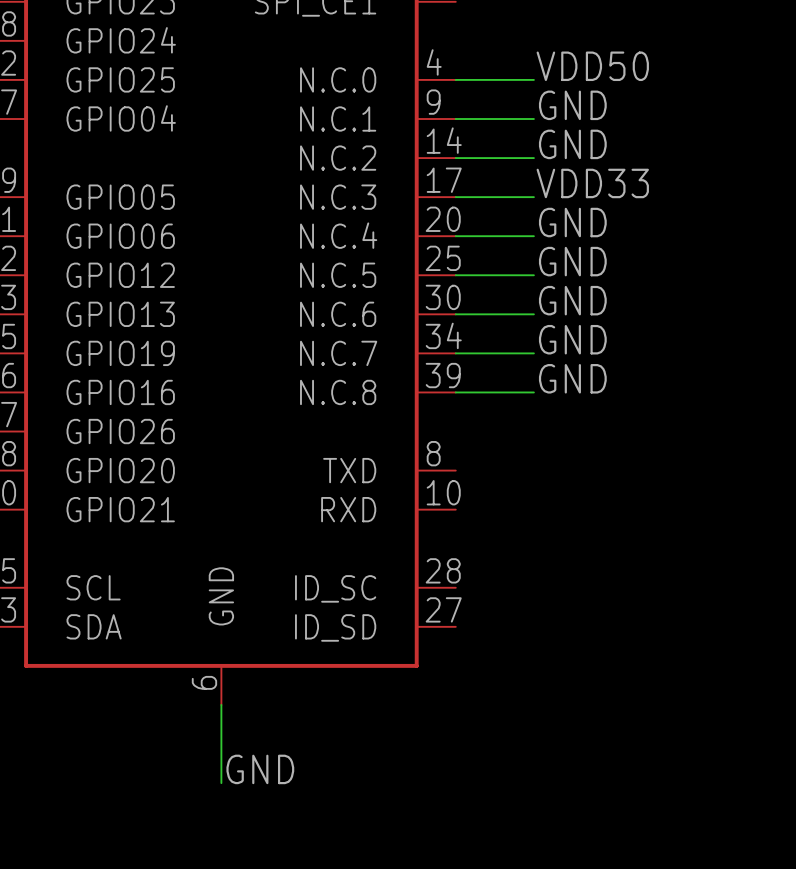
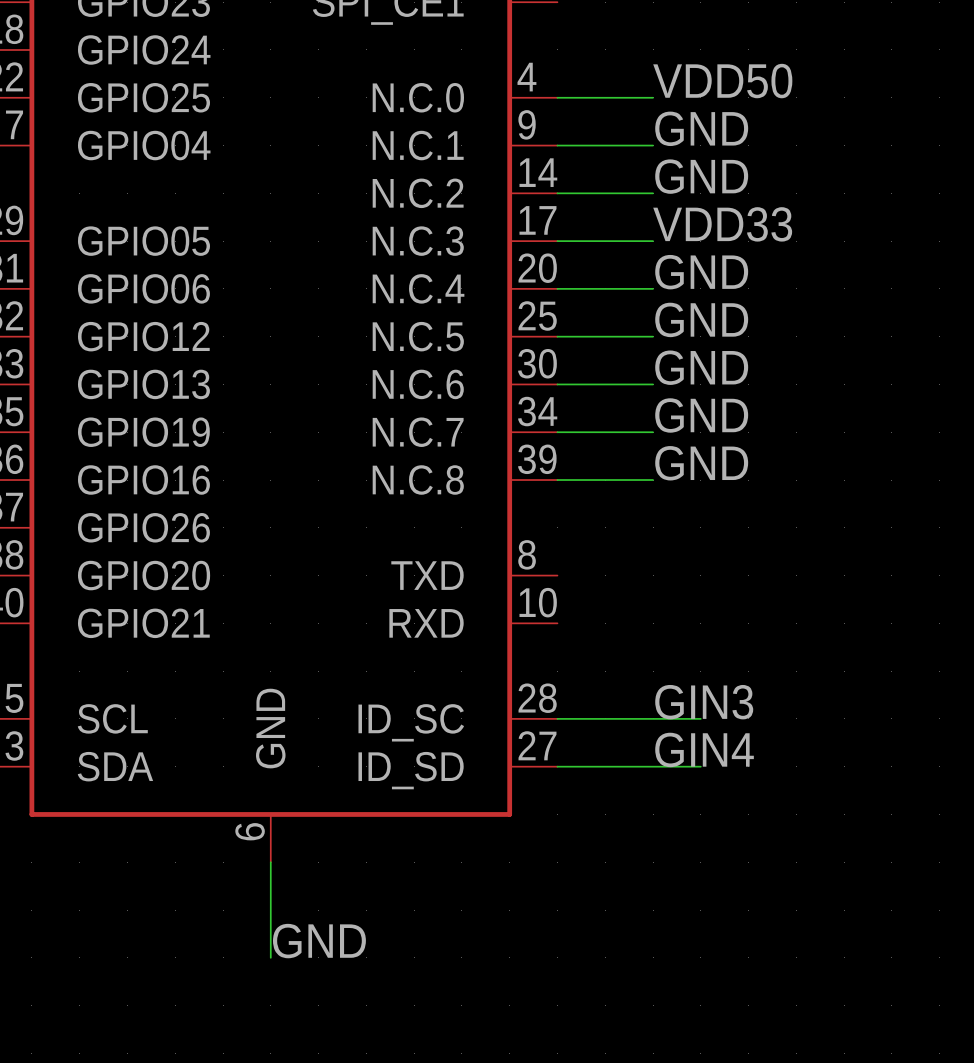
label: none -> GIN3 (704, 702)
wire: none -> (557, 718) (700, 718)
label: none -> GIN4 (704, 749)
wire: none -> (557, 766) (700, 766)

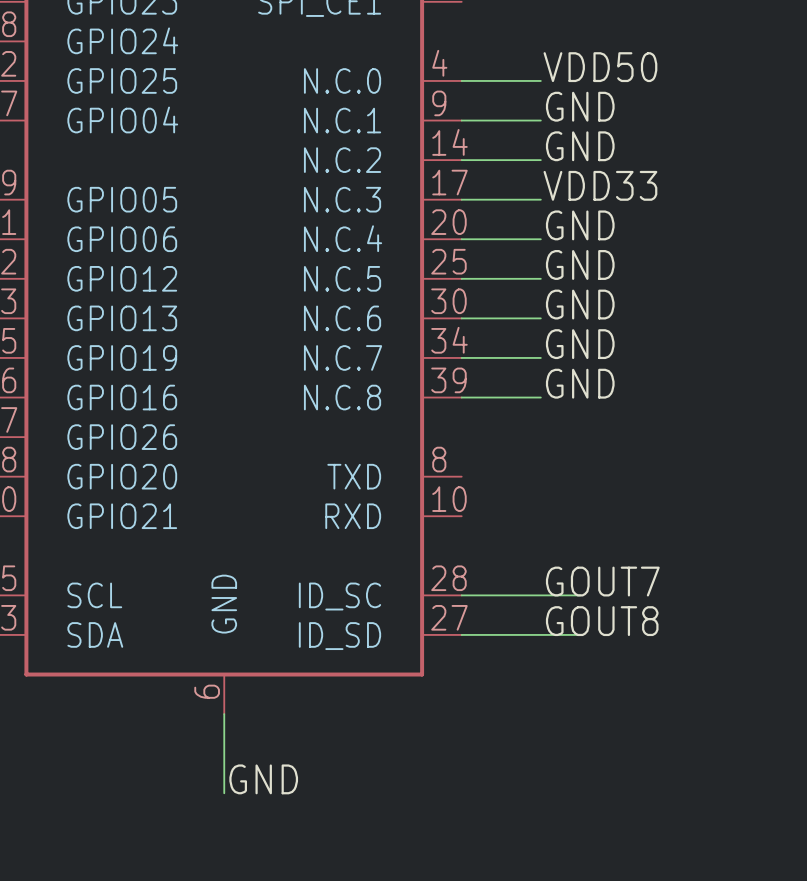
label: GIN3 (704, 702) -> GOUT7 (602, 581)
label: GIN4 (704, 749) -> GOUT8 (602, 621)

